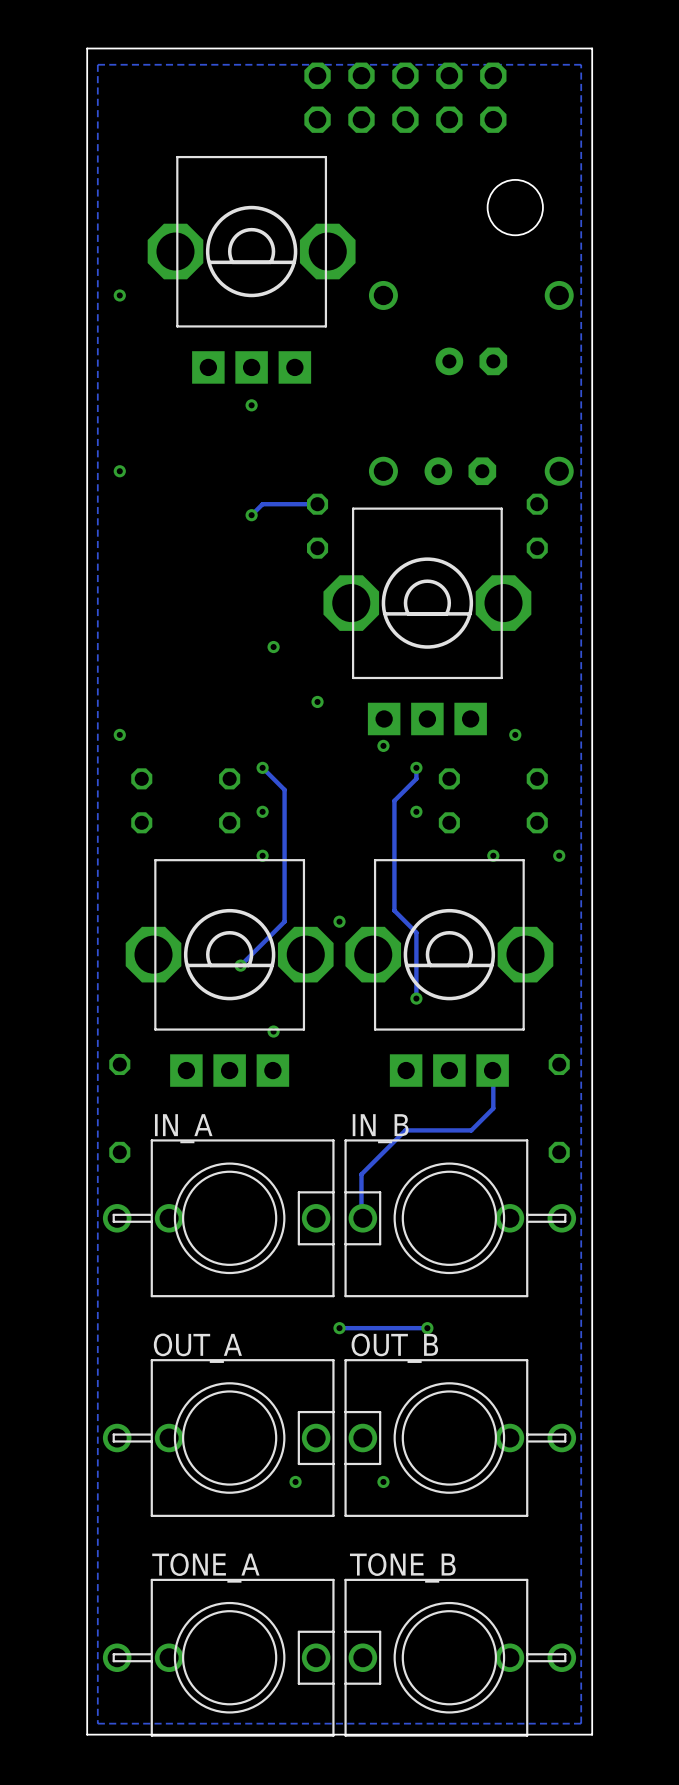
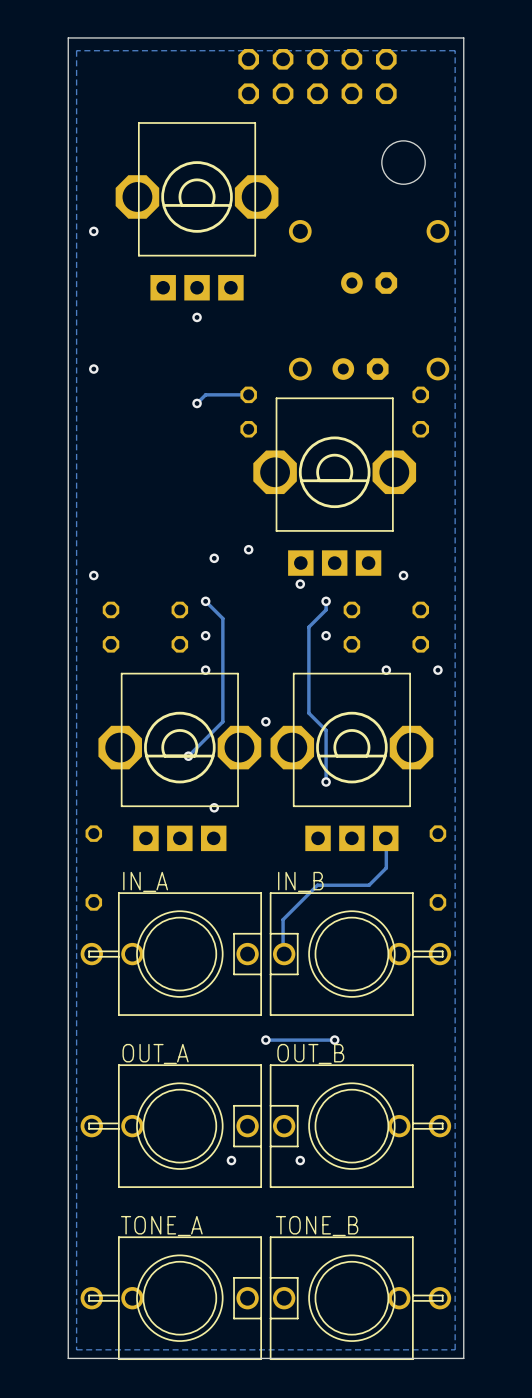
via position: (273, 647) -> (214, 558)

